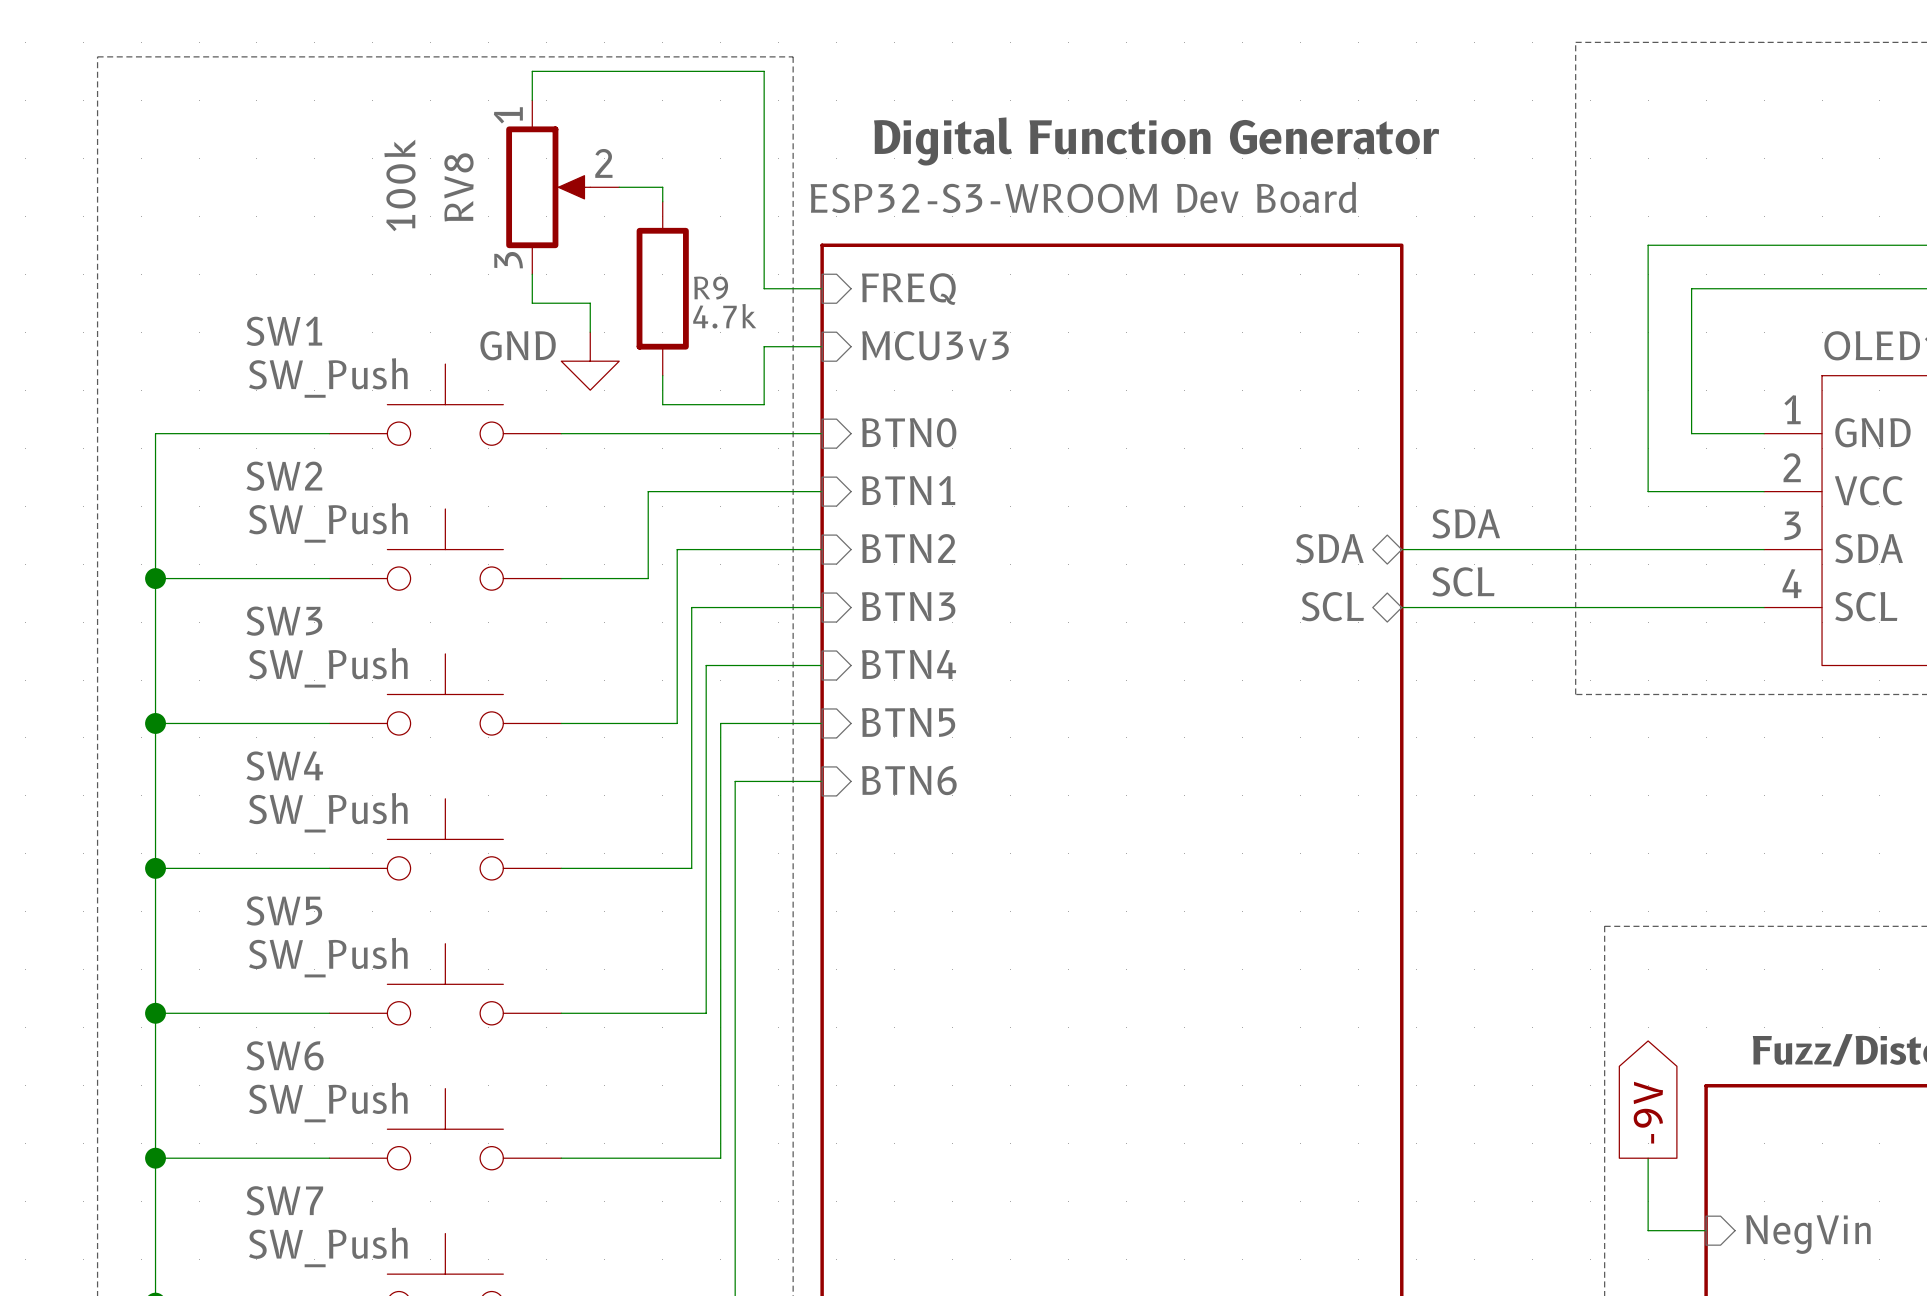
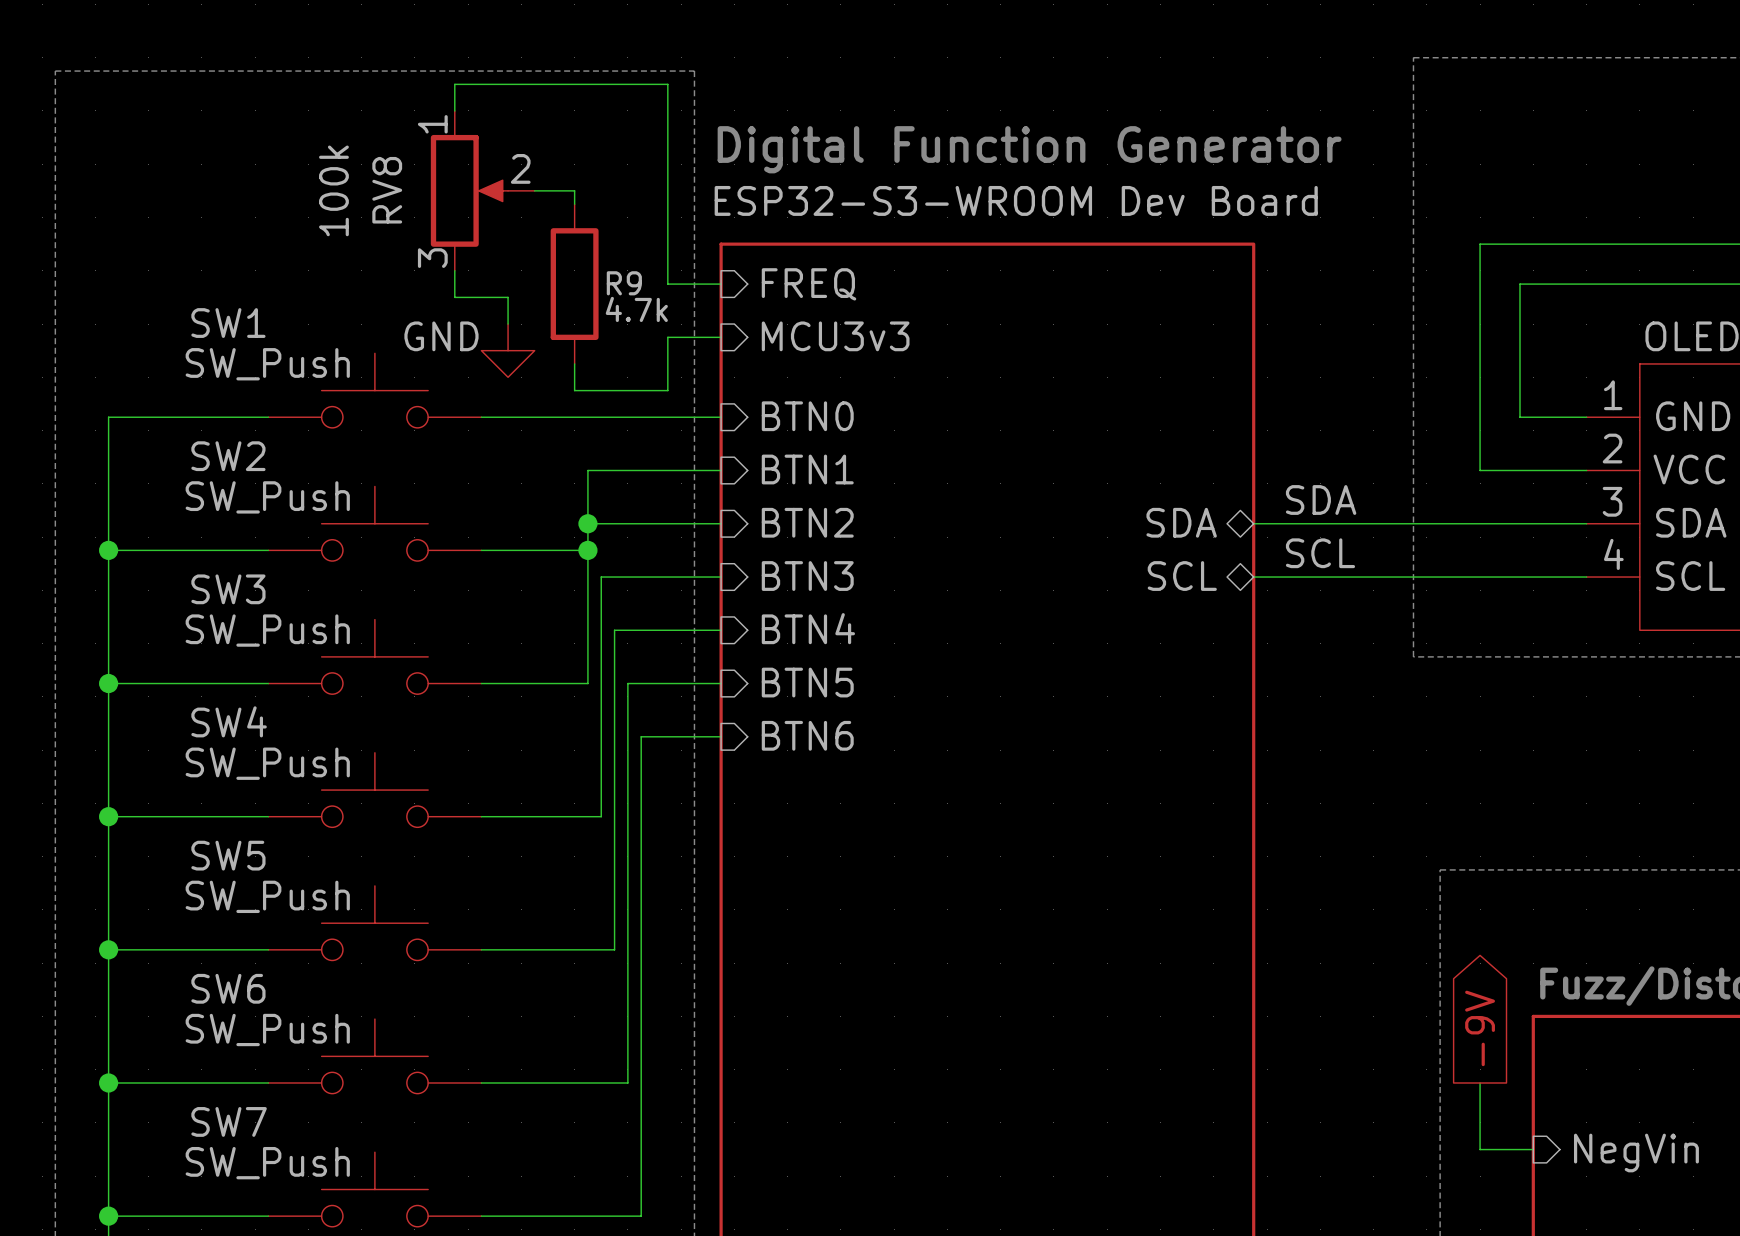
wire: (677, 491) (648, 491) (648, 578) -> (587, 470) (587, 523)
junction: none -> (587, 523)
wire: none -> (561, 550) (587, 550)
junction: none -> (587, 550)

